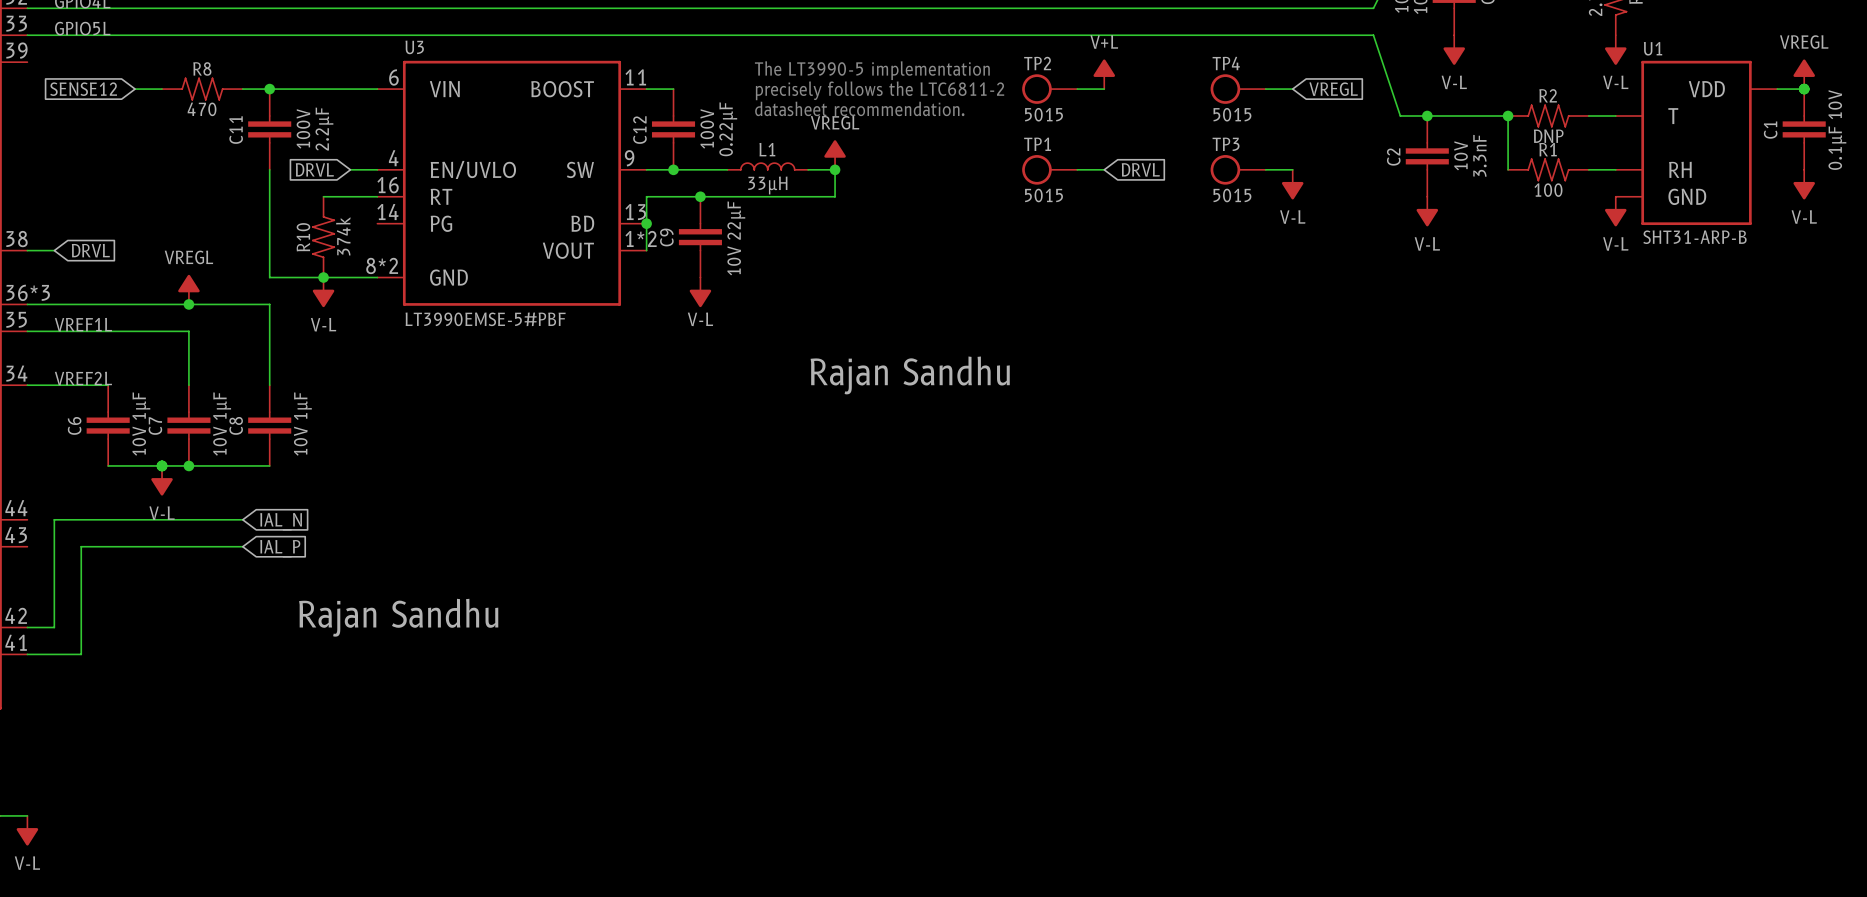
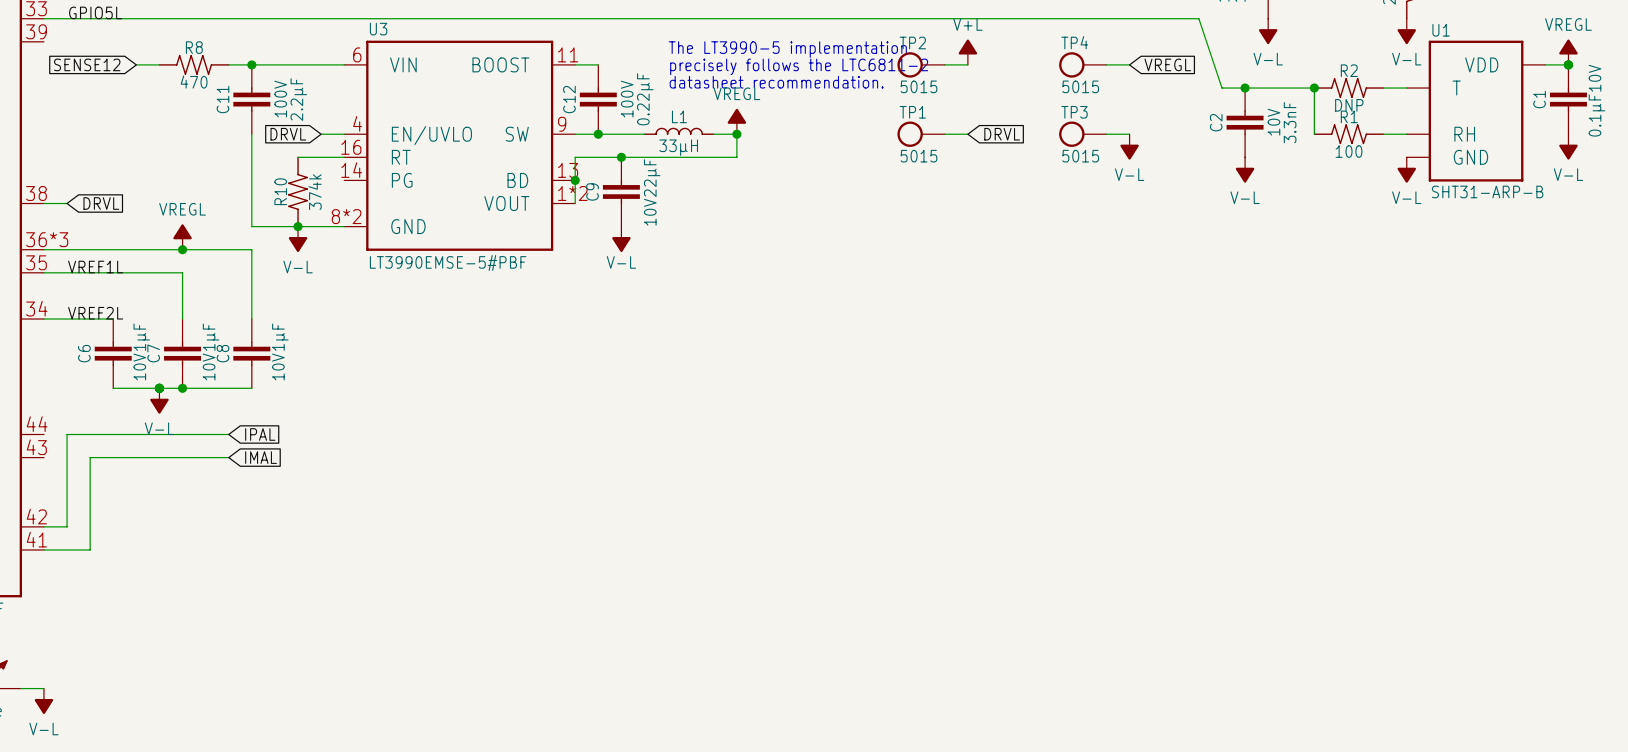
text: Rajan Sandhu (910, 375) -> none
global label: IAL_N (281, 521) -> IPAL (260, 434)
global label: IAL_P (280, 548) -> IMAL (261, 457)
text: Rajan Sandhu (398, 617) -> none

